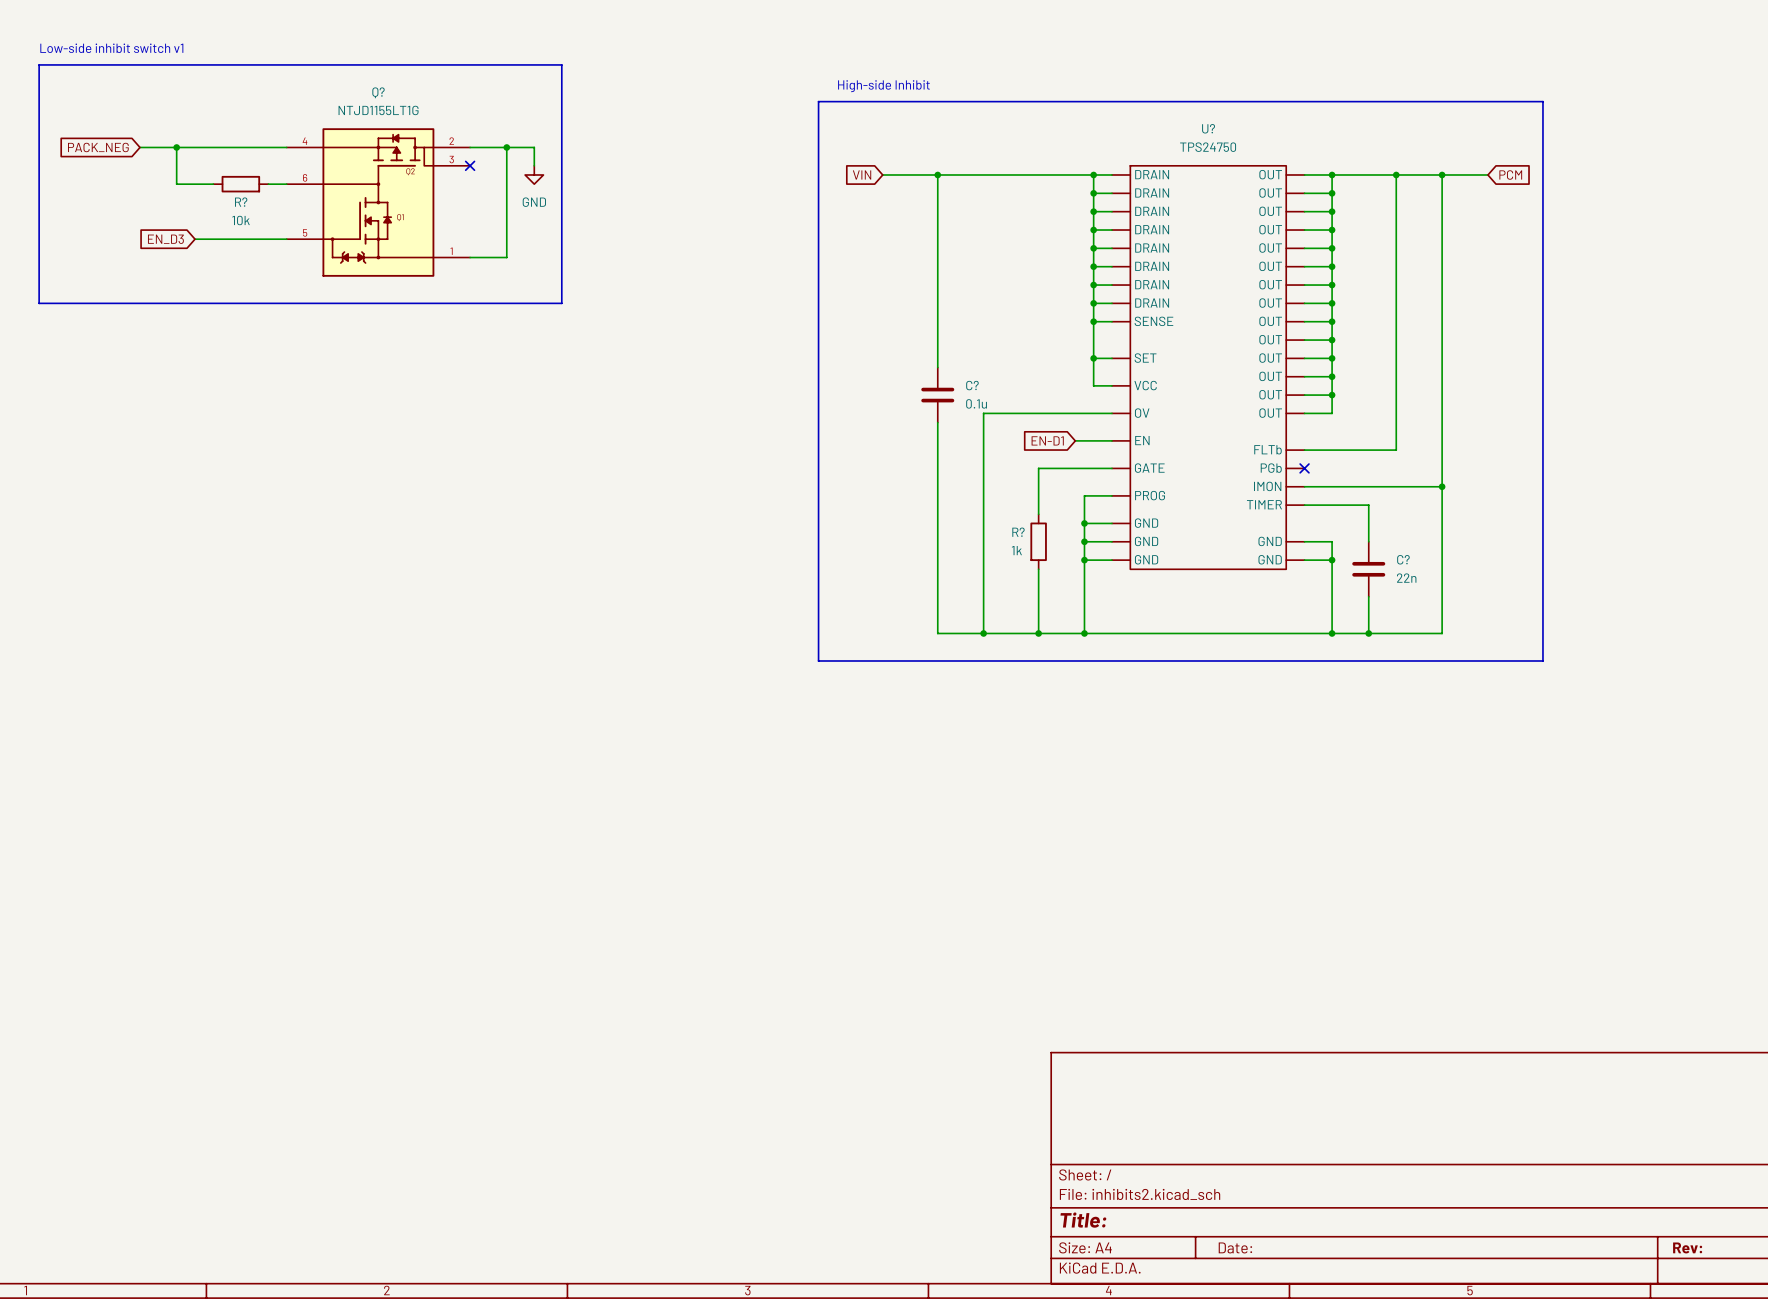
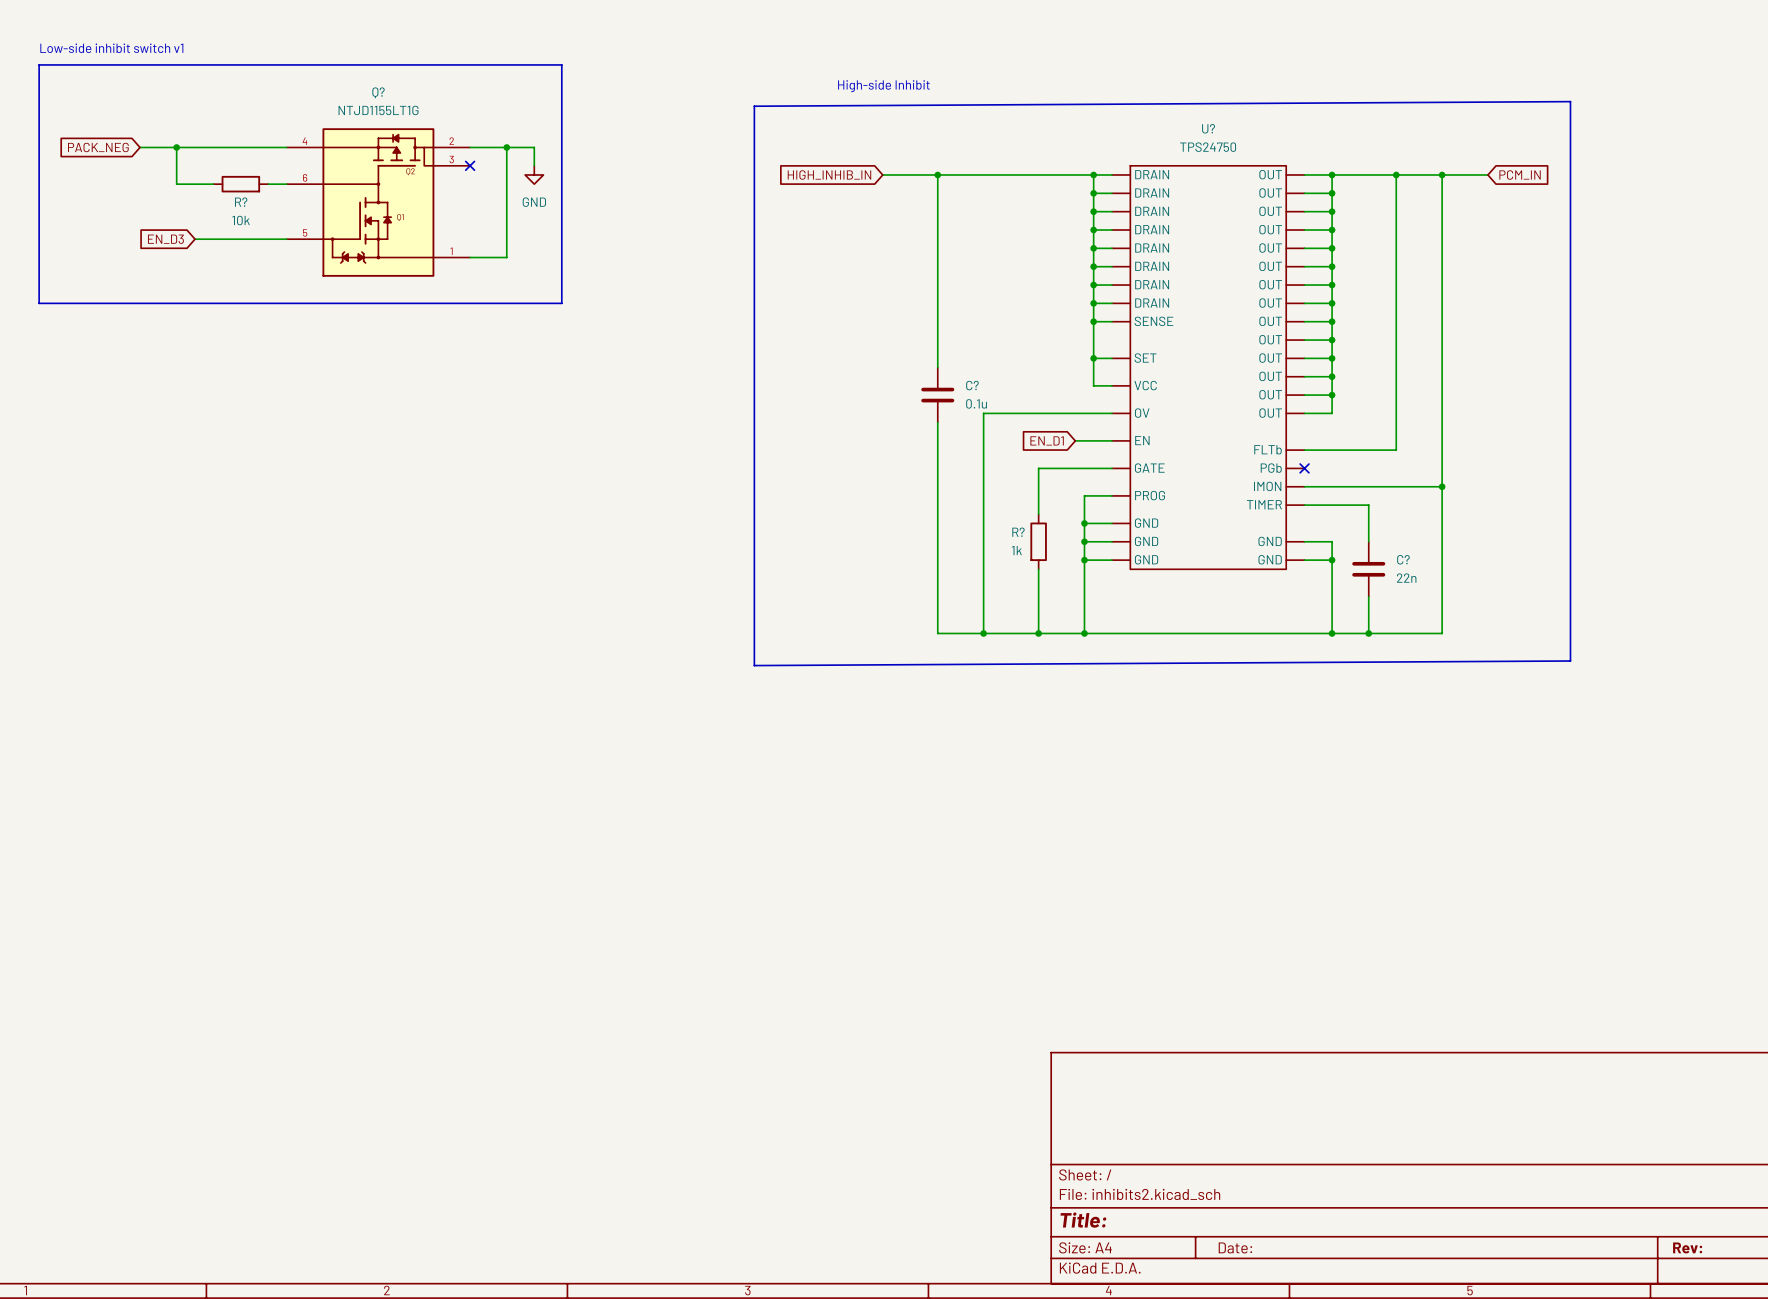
line: (818, 101) (1542, 101) (1542, 660) (818, 660) (818, 101) -> (1570, 101) (754, 106) (754, 665) (1570, 660) (1570, 101)
global label: VIN (862, 174) -> HIGH_INHIB_IN (829, 174)
global label: PCM (1510, 175) -> PCM_IN (1520, 175)
global label: EN-D1 (1047, 440) -> EN_D1 (1047, 440)

